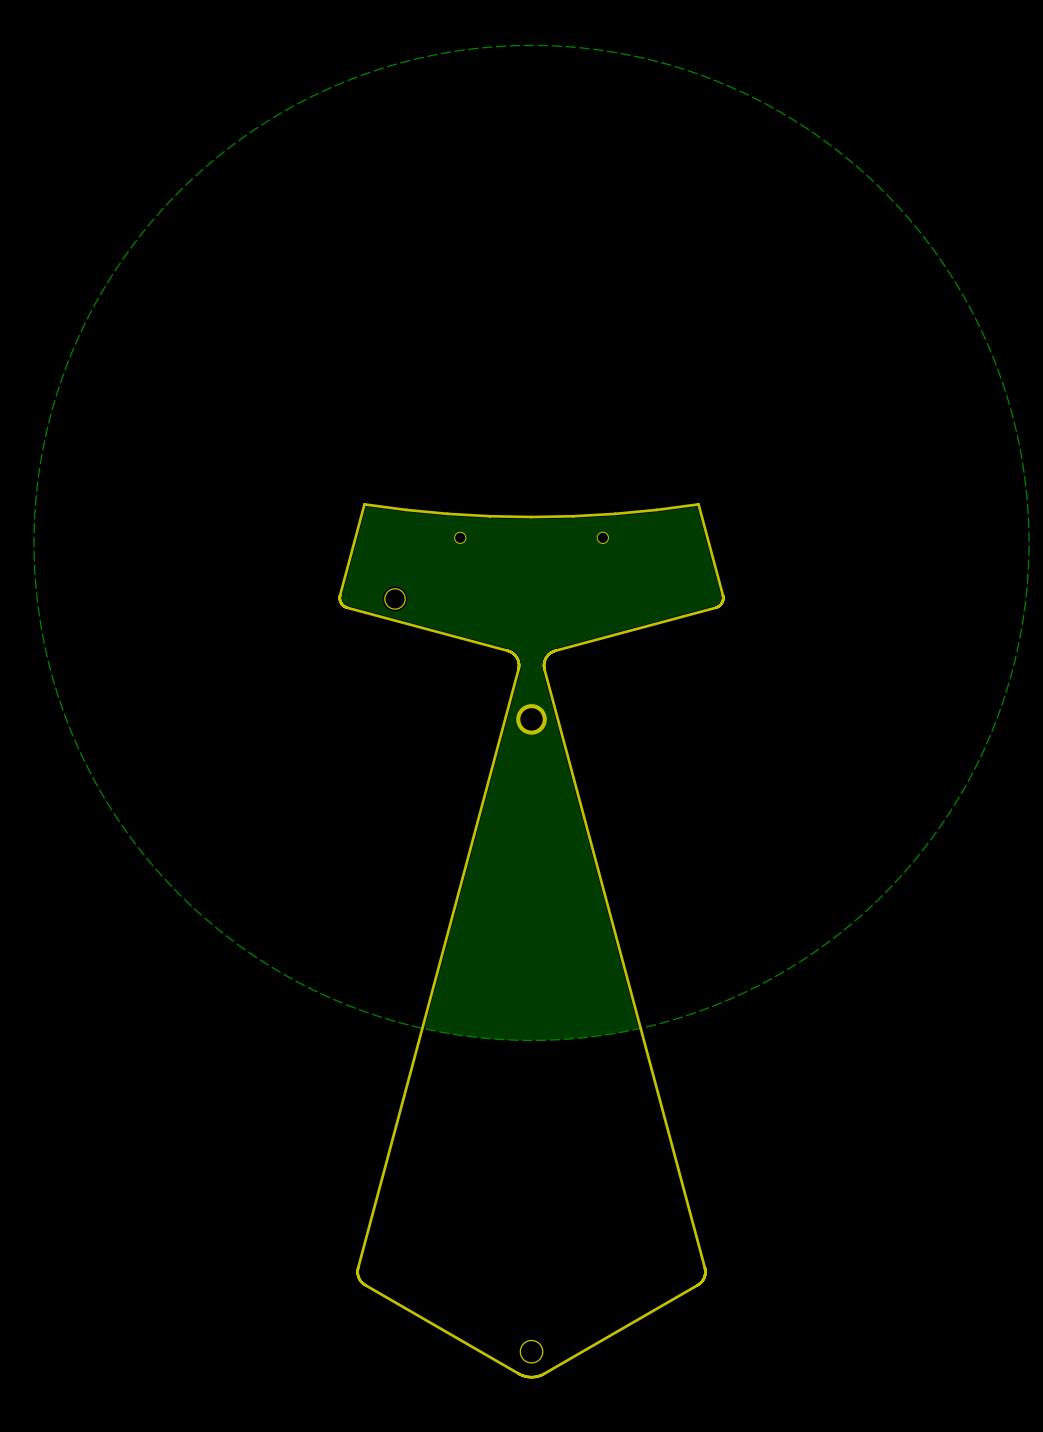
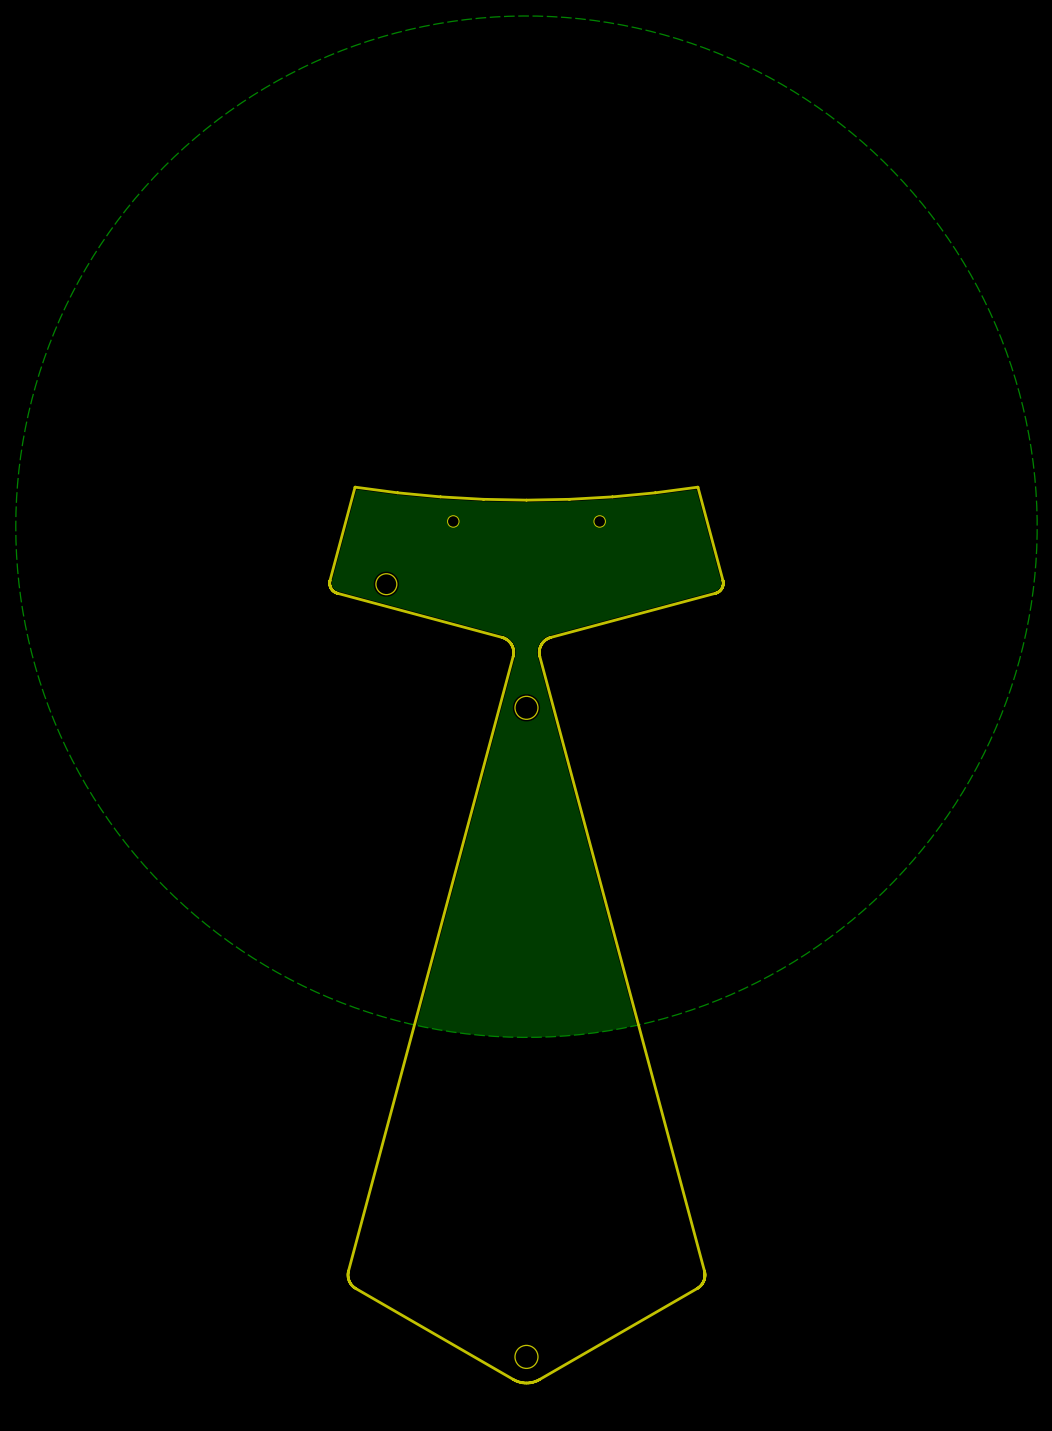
part footprint: [338, 503, 725, 1379] -> [328, 485, 725, 1385]

